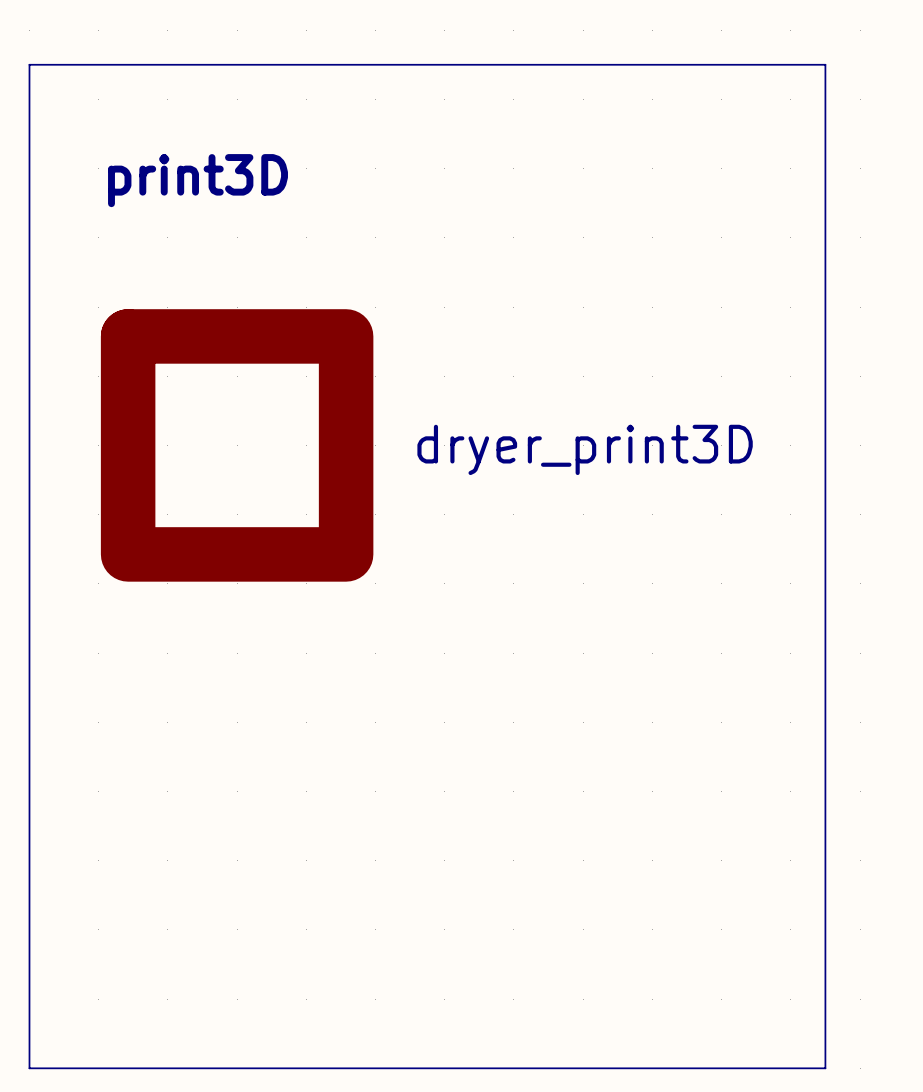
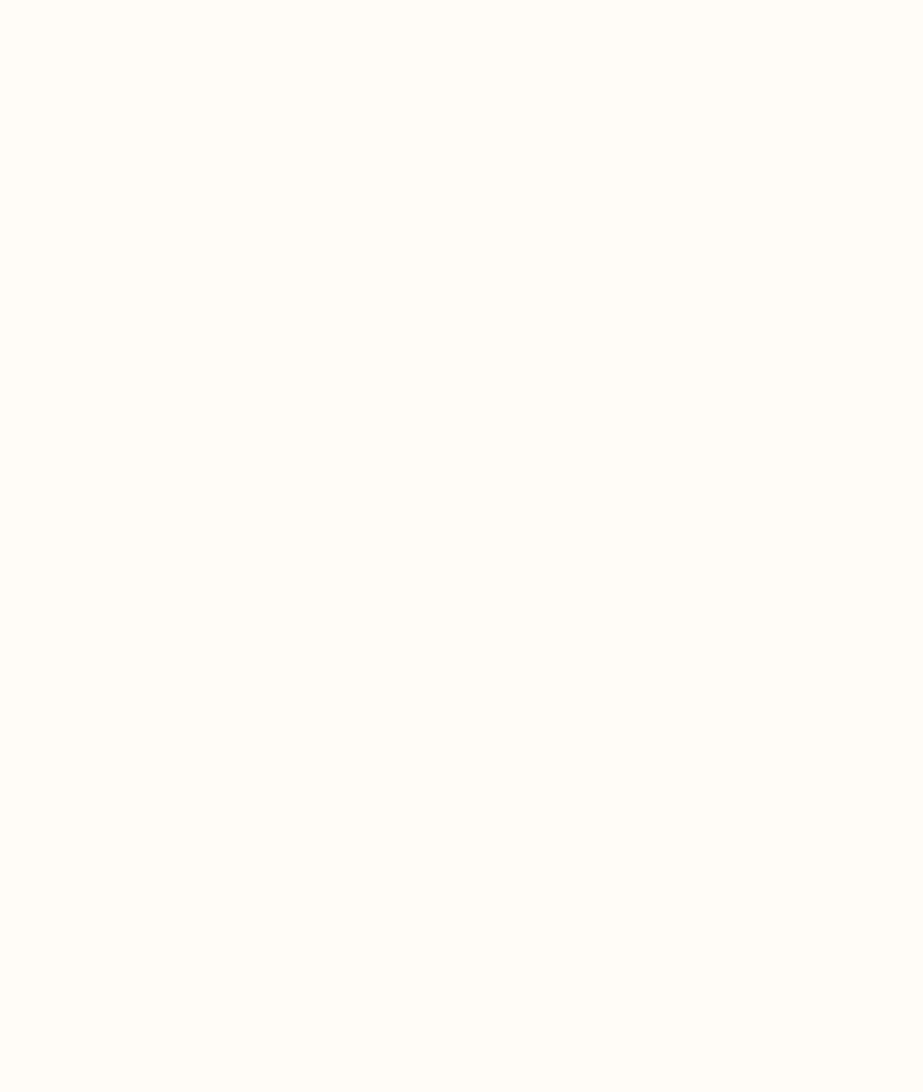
line: (29, 64) (825, 64) (825, 1068) (29, 1068) (29, 64) -> none
text: print3D (198, 180) -> none
part: dryer_print3D (237, 445) -> none

